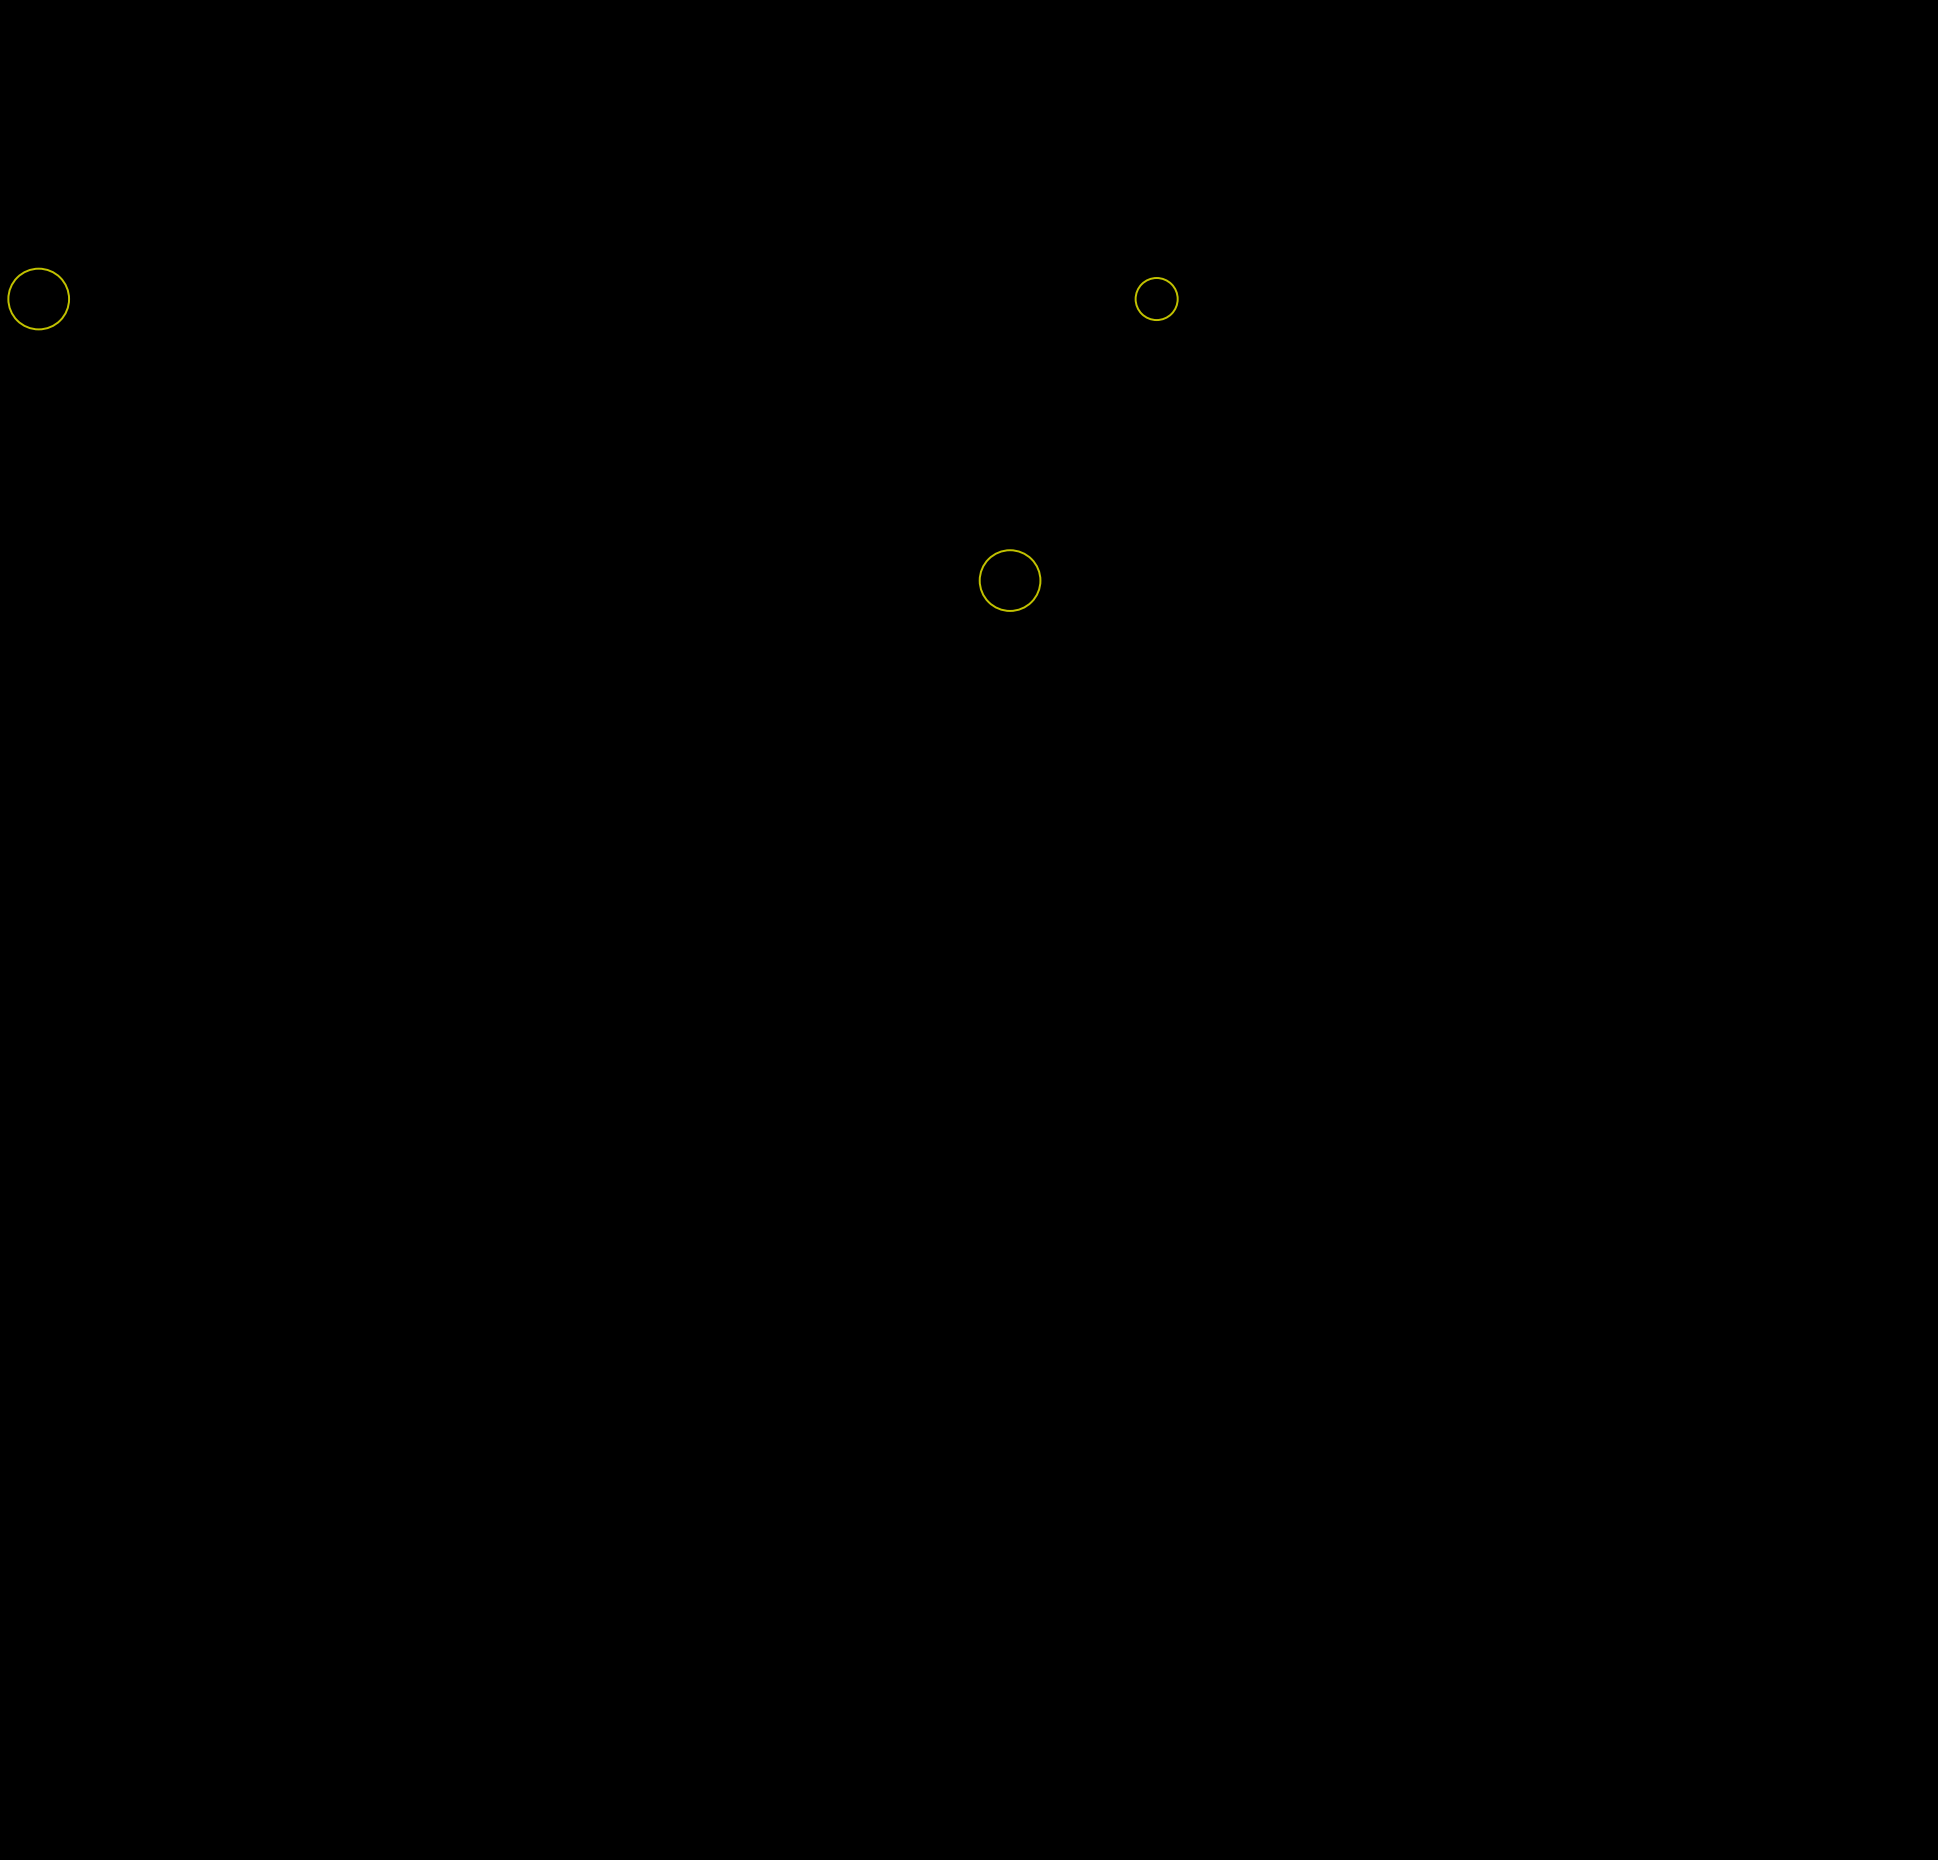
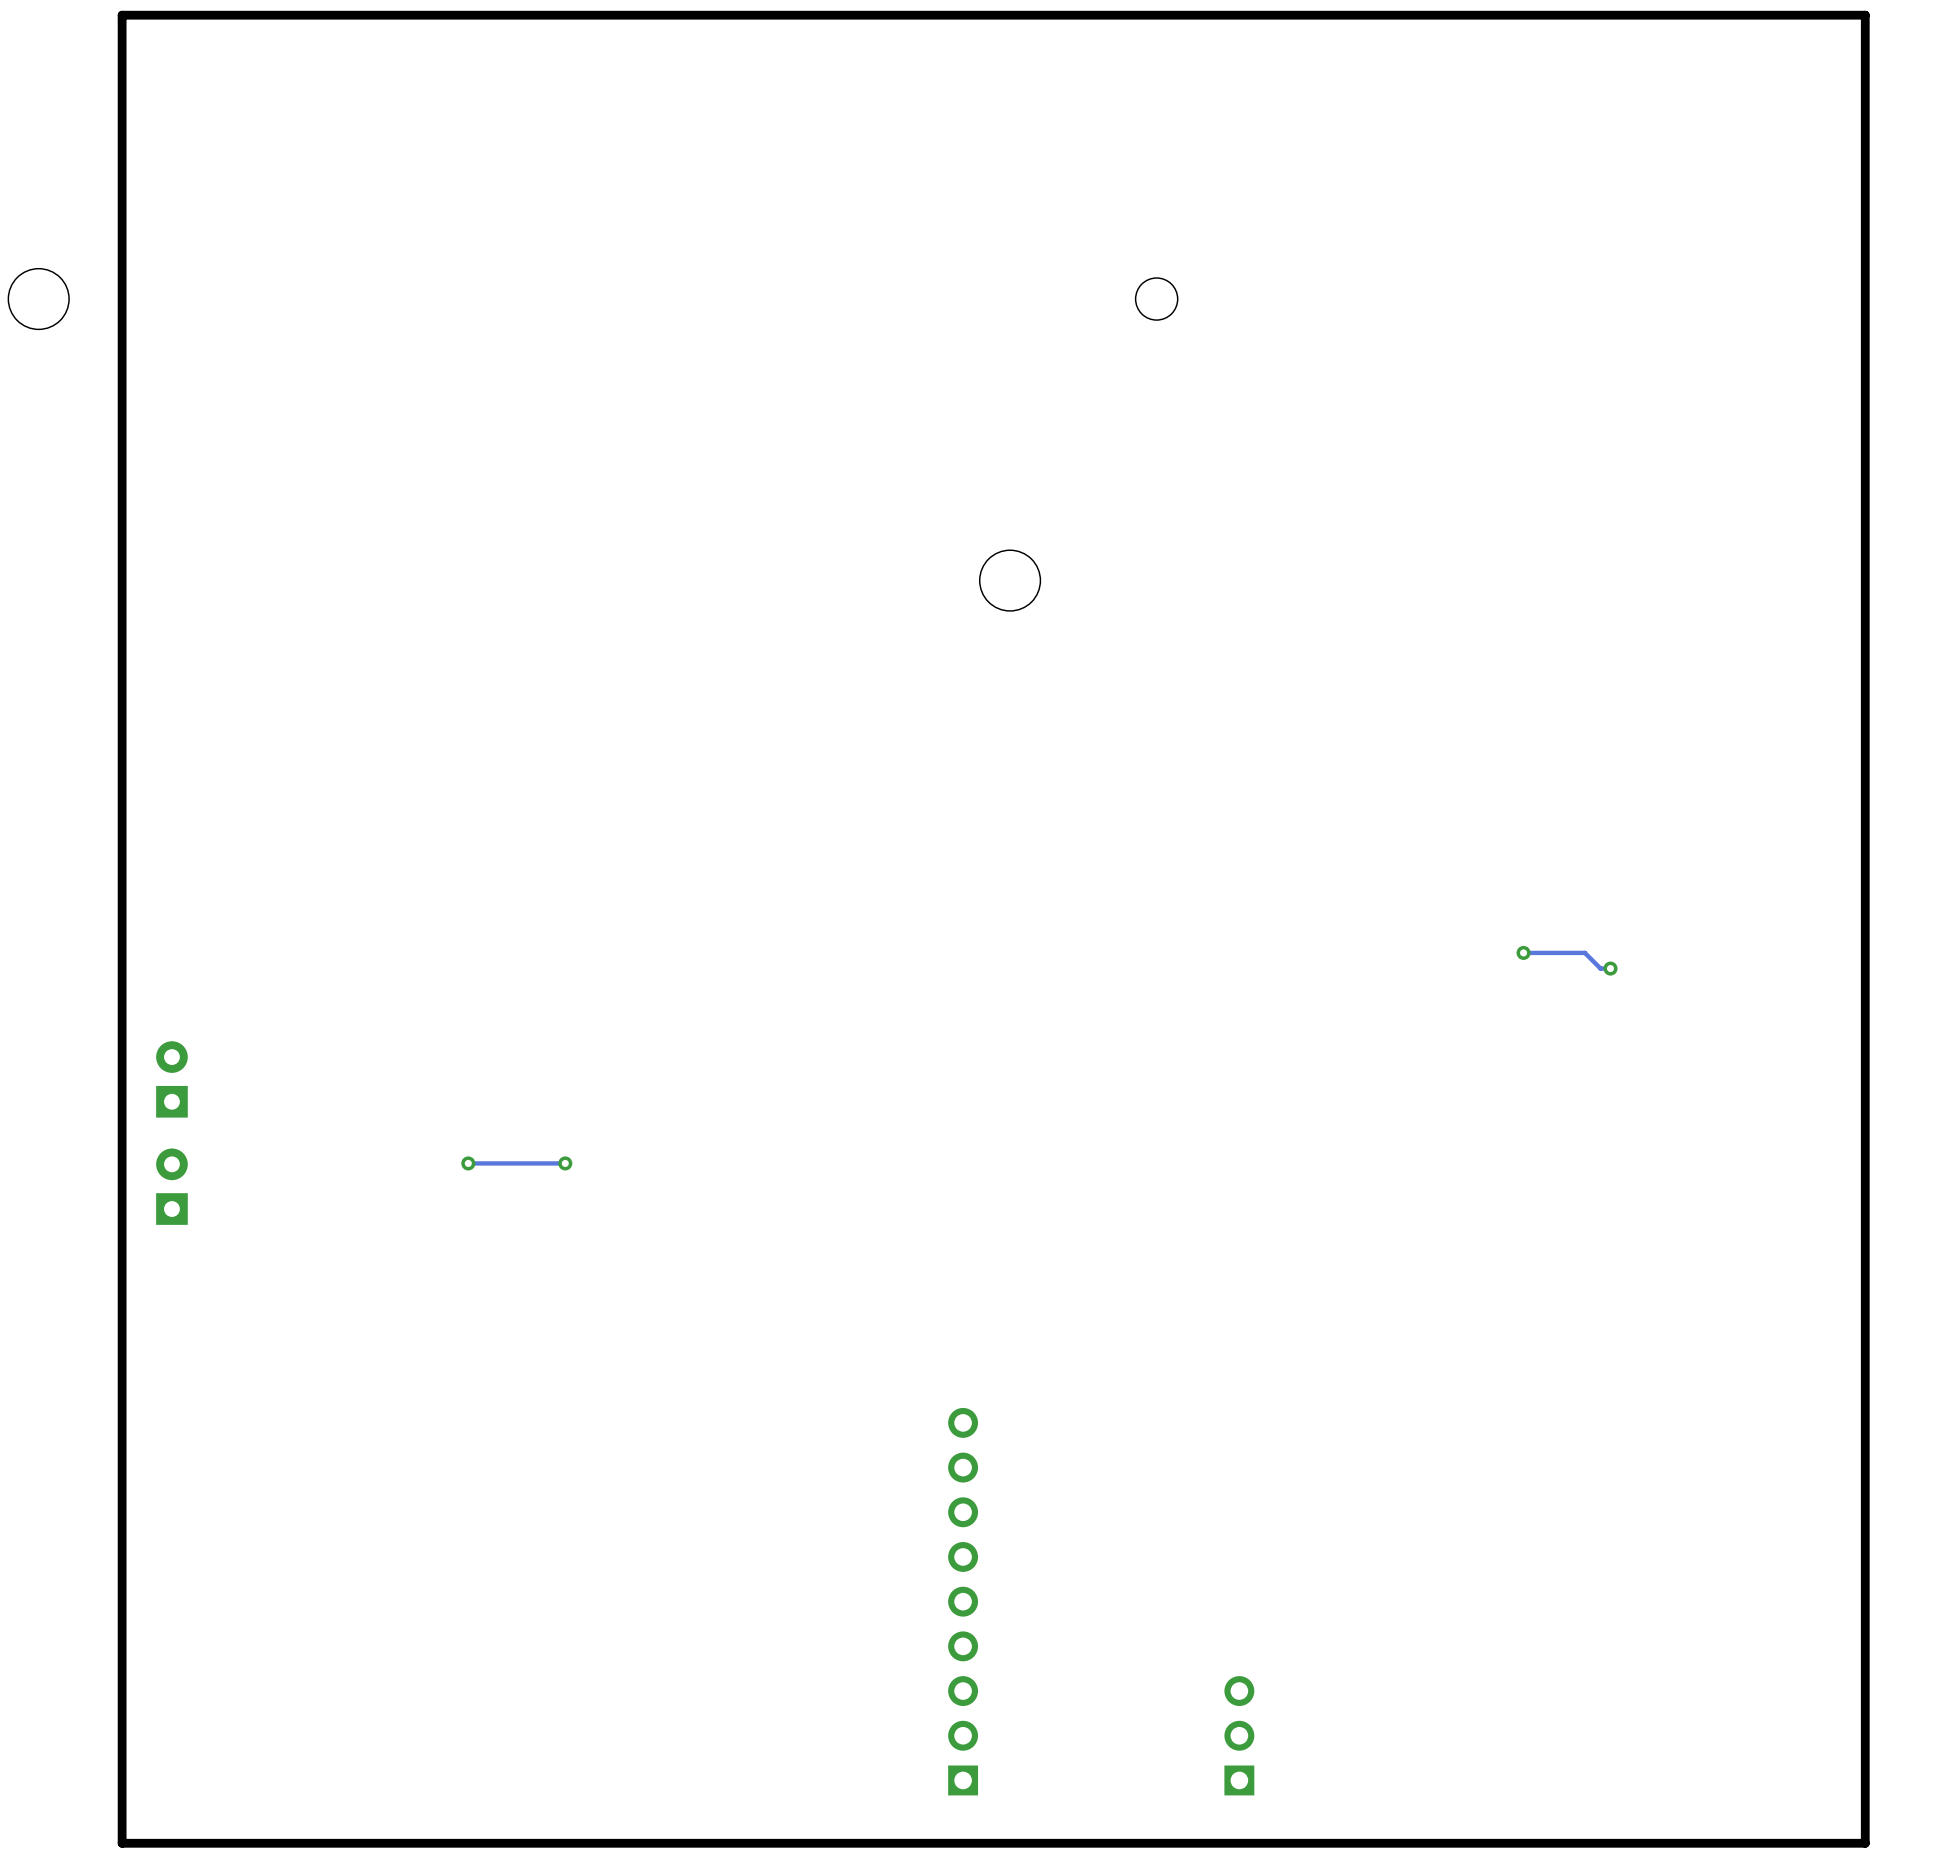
board edge: none -> (1865, 15) (1865, 1843) (122, 1843) (122, 15) (1865, 15)
track: none -> (1523, 952) (1584, 952) (1600, 968) (1610, 968)
via: none -> (1523, 952)
via: none -> (1610, 968)
part: none -> (171, 1079)
via: none -> (468, 1163)
track: none -> (565, 1163) (468, 1163)
via: none -> (565, 1163)
part: none -> (171, 1186)
part: none -> (963, 1601)
part: none -> (1239, 1735)

